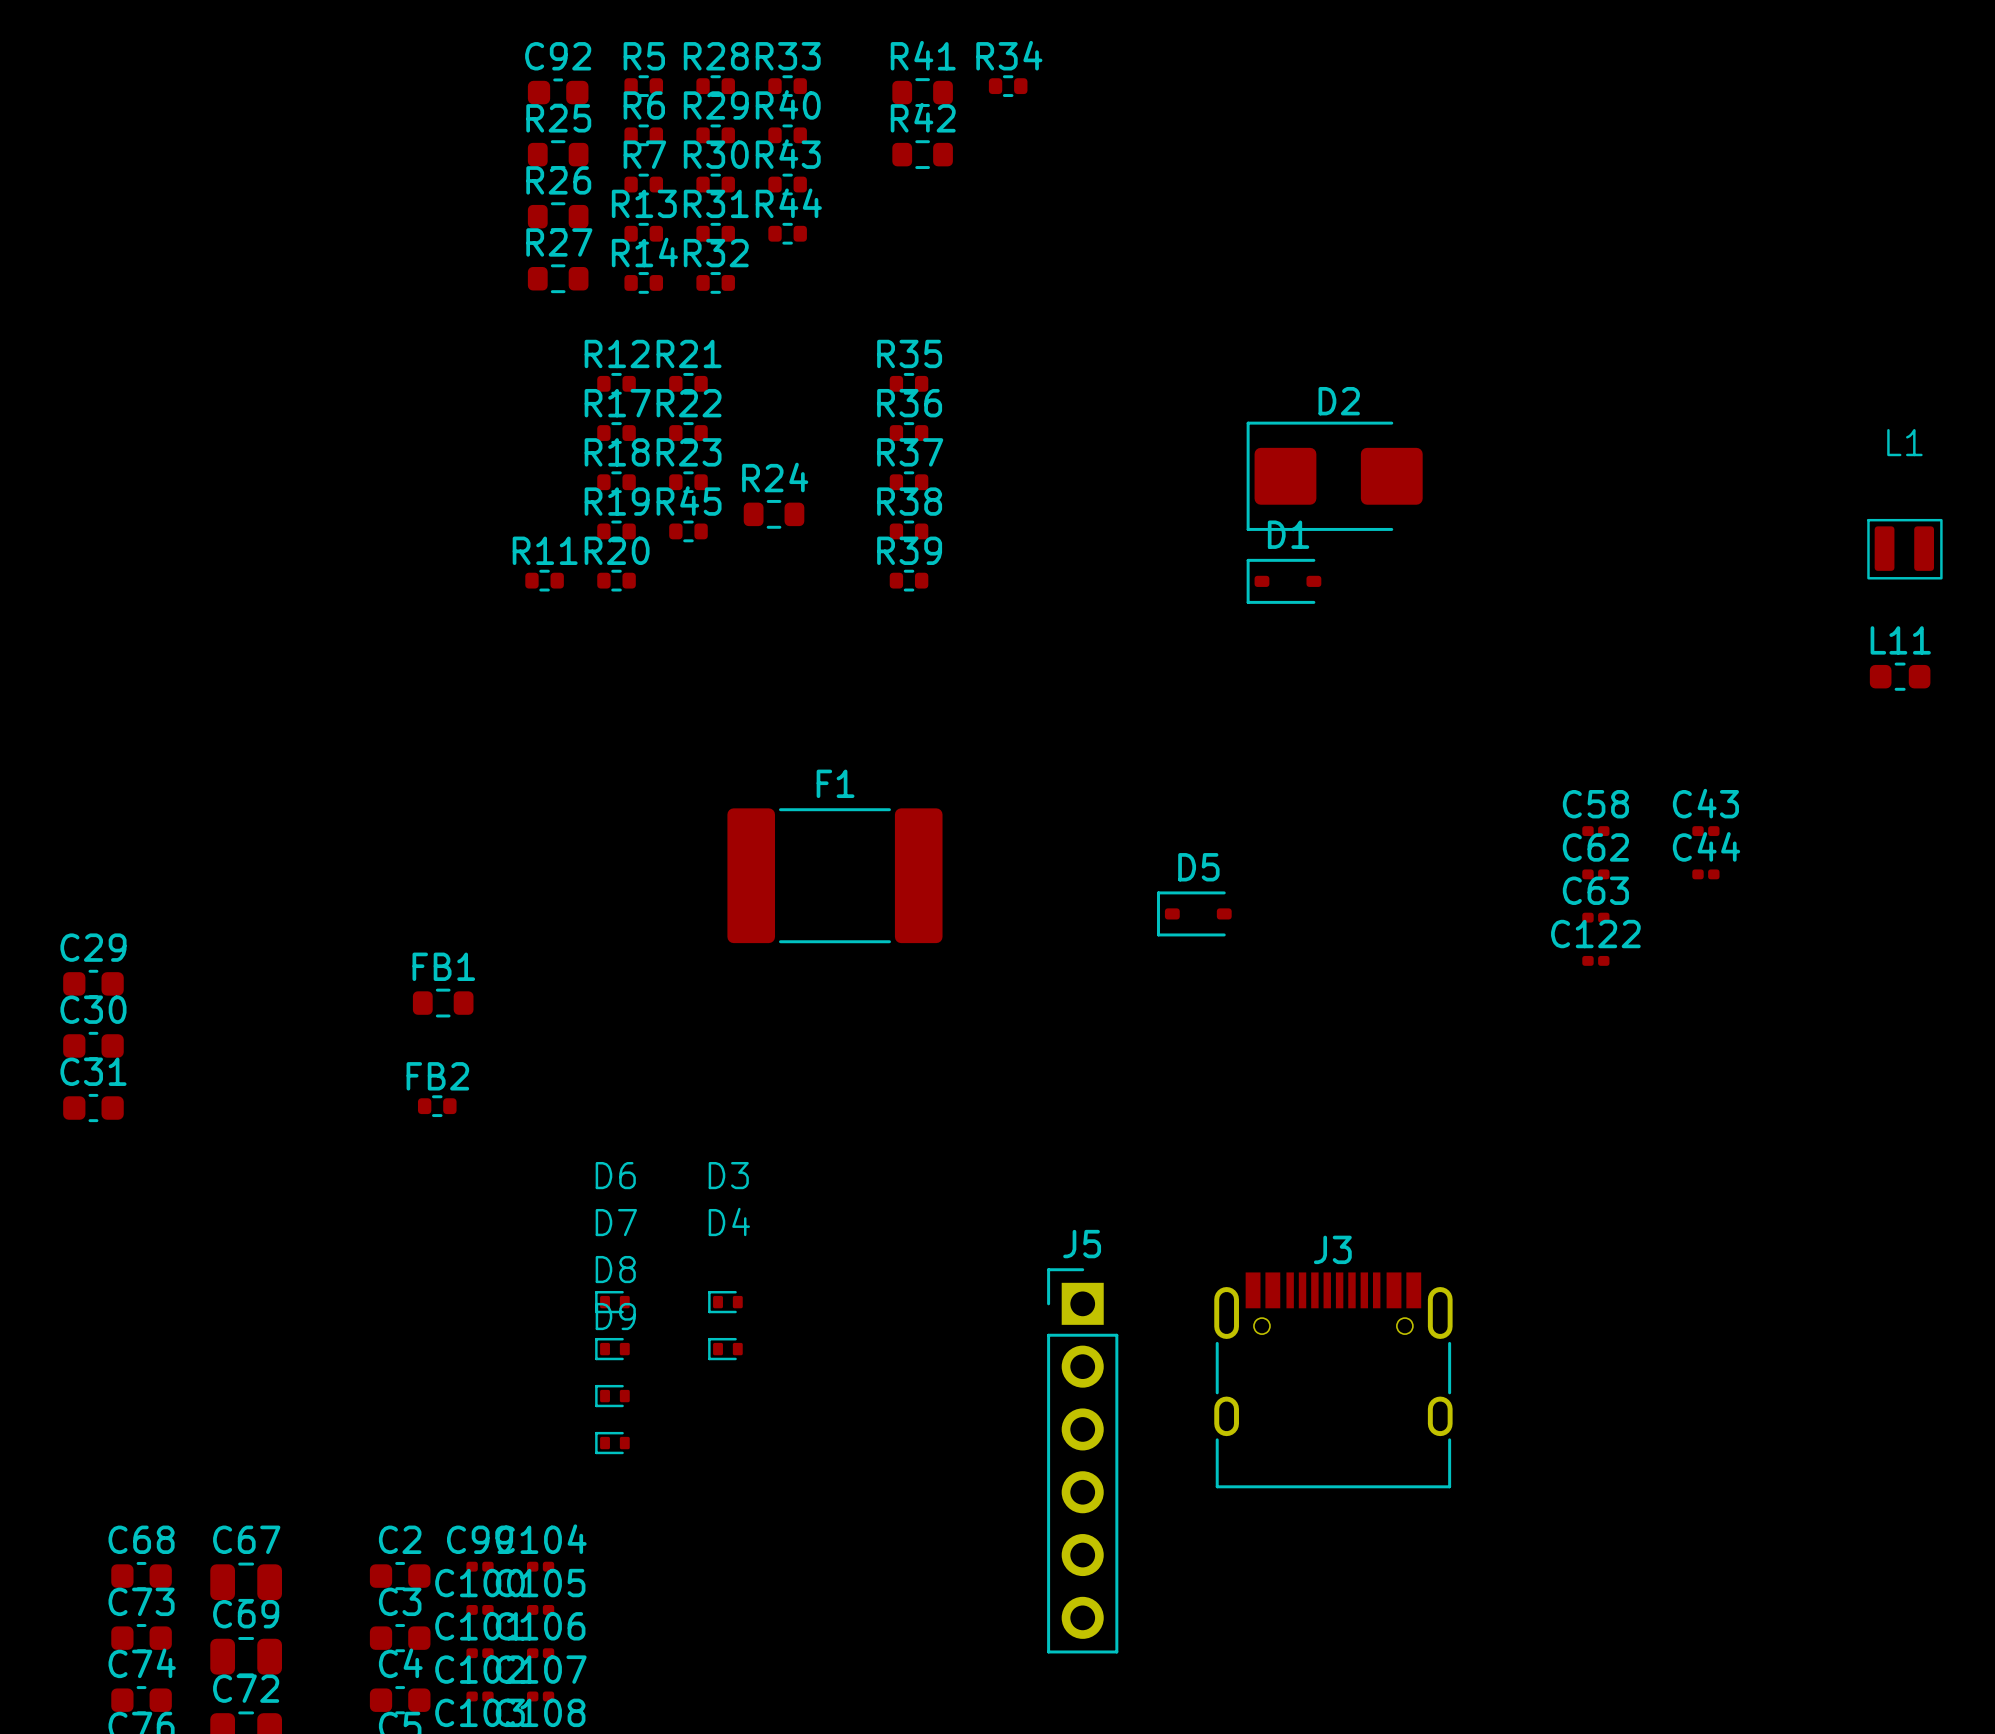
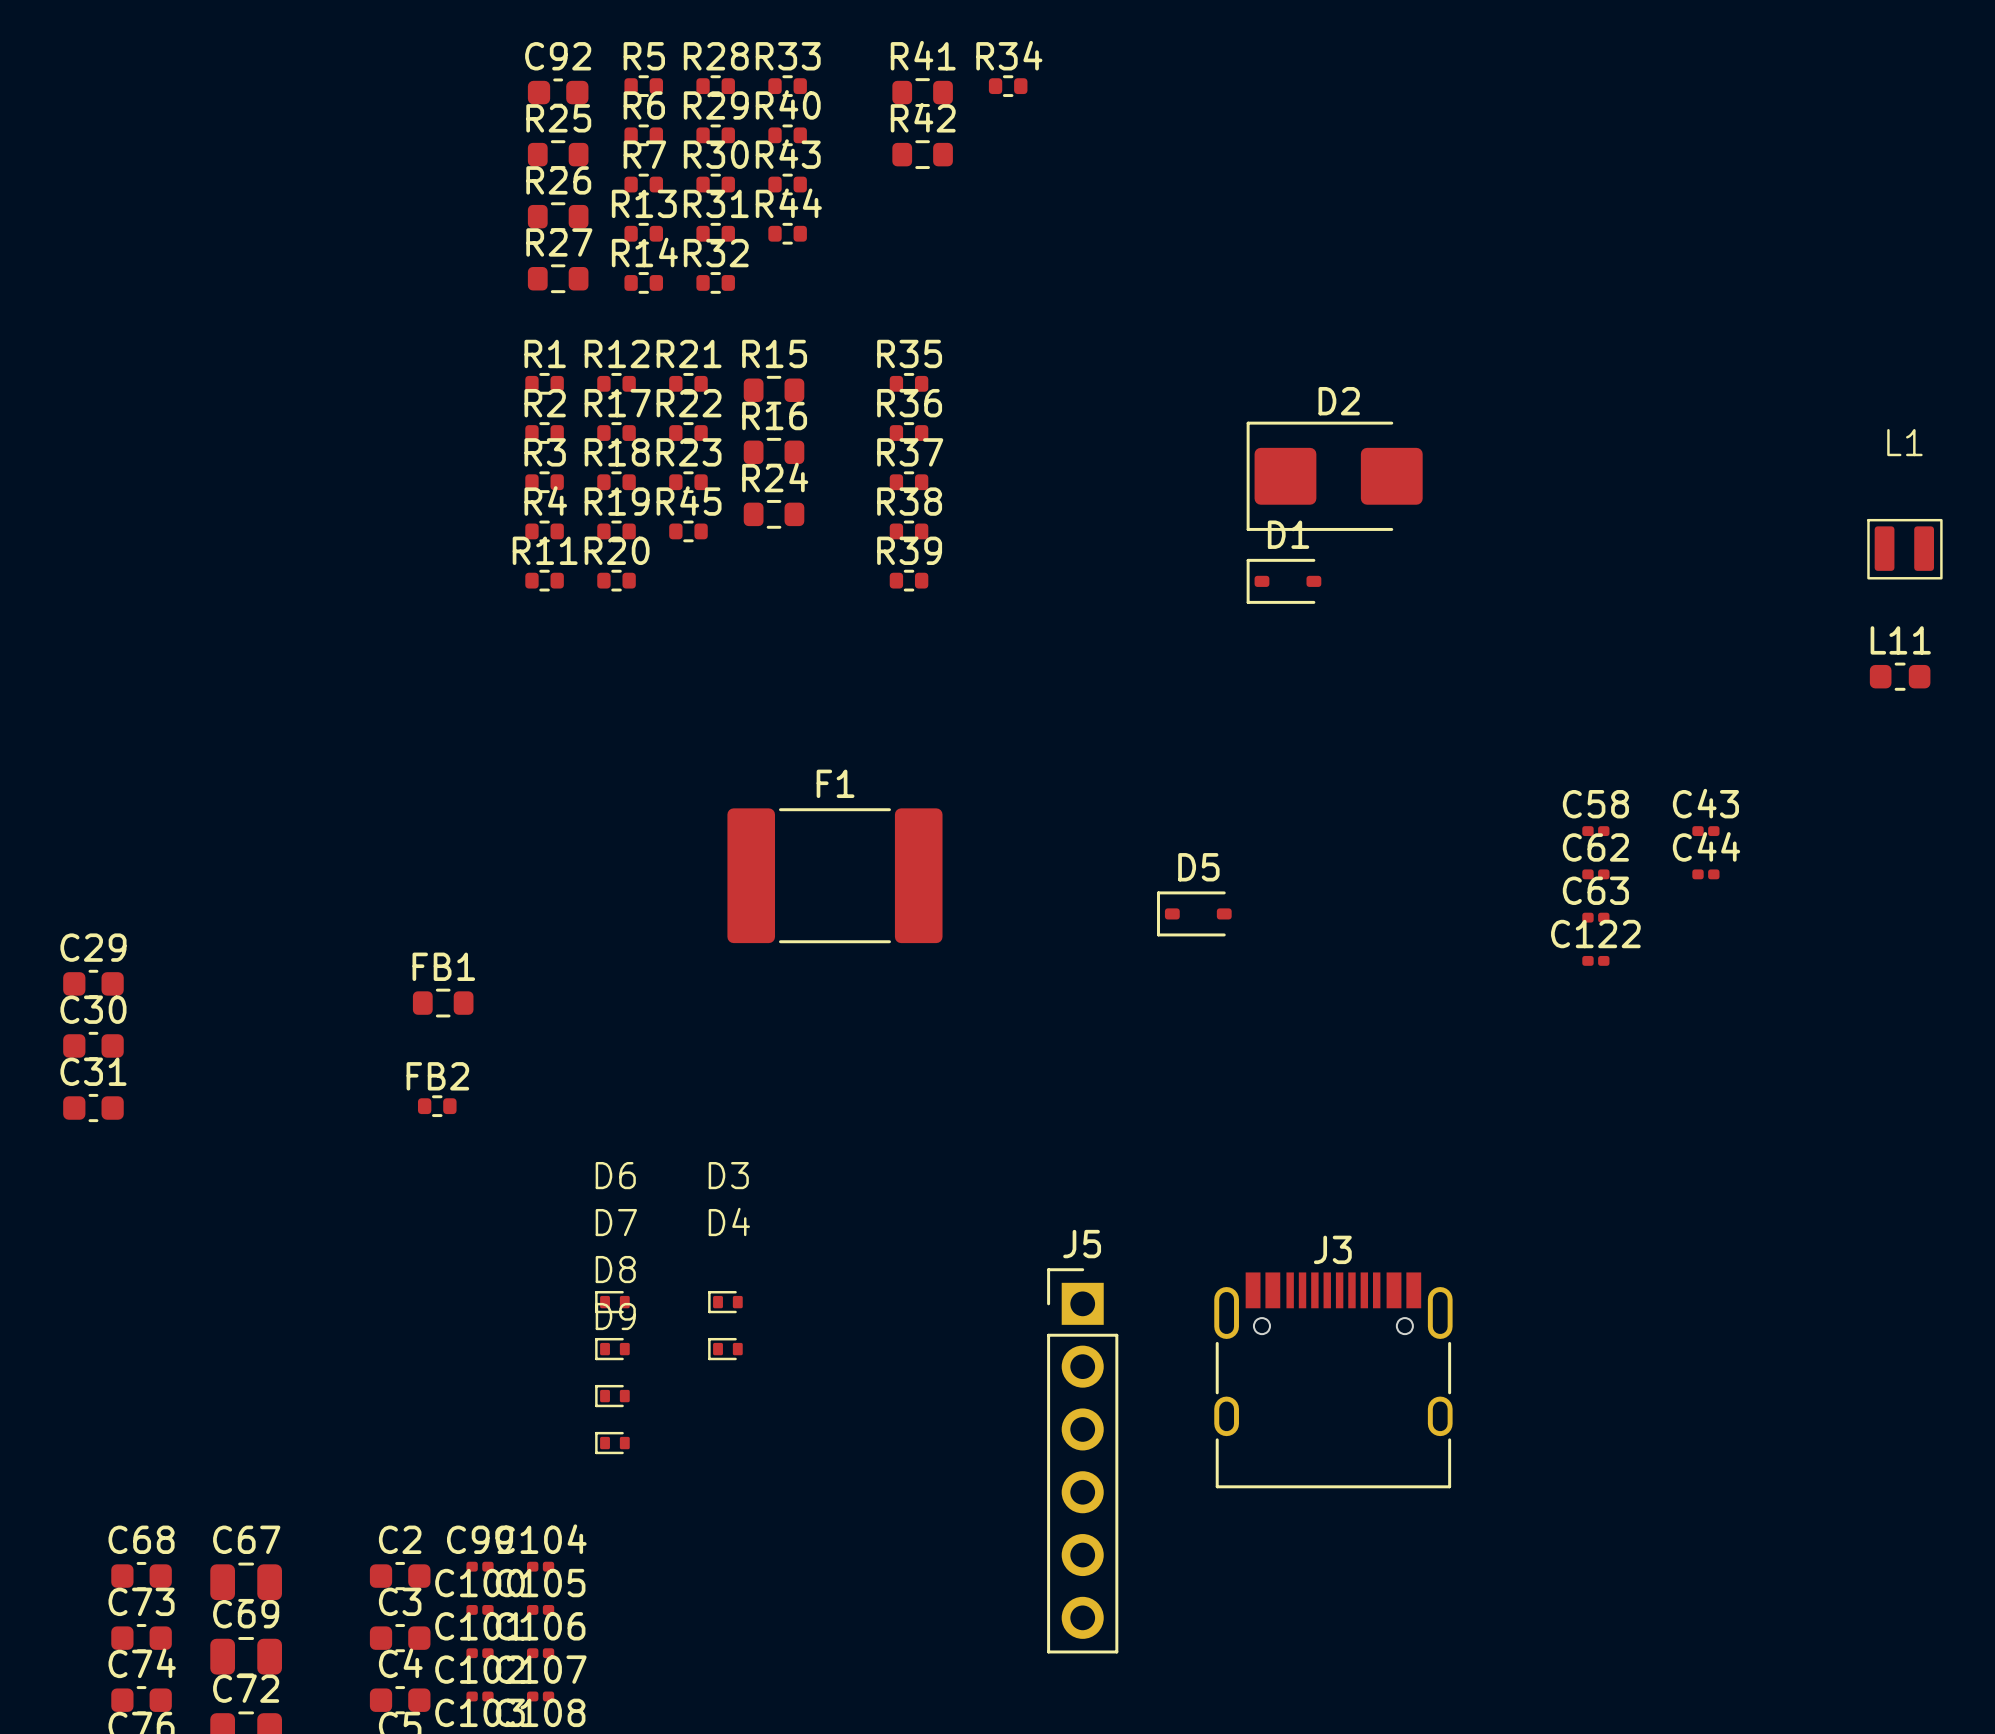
R1: none -> (544, 383)
R15: none -> (774, 390)
R2: none -> (544, 433)
R16: none -> (774, 452)
R3: none -> (544, 482)
R4: none -> (544, 531)

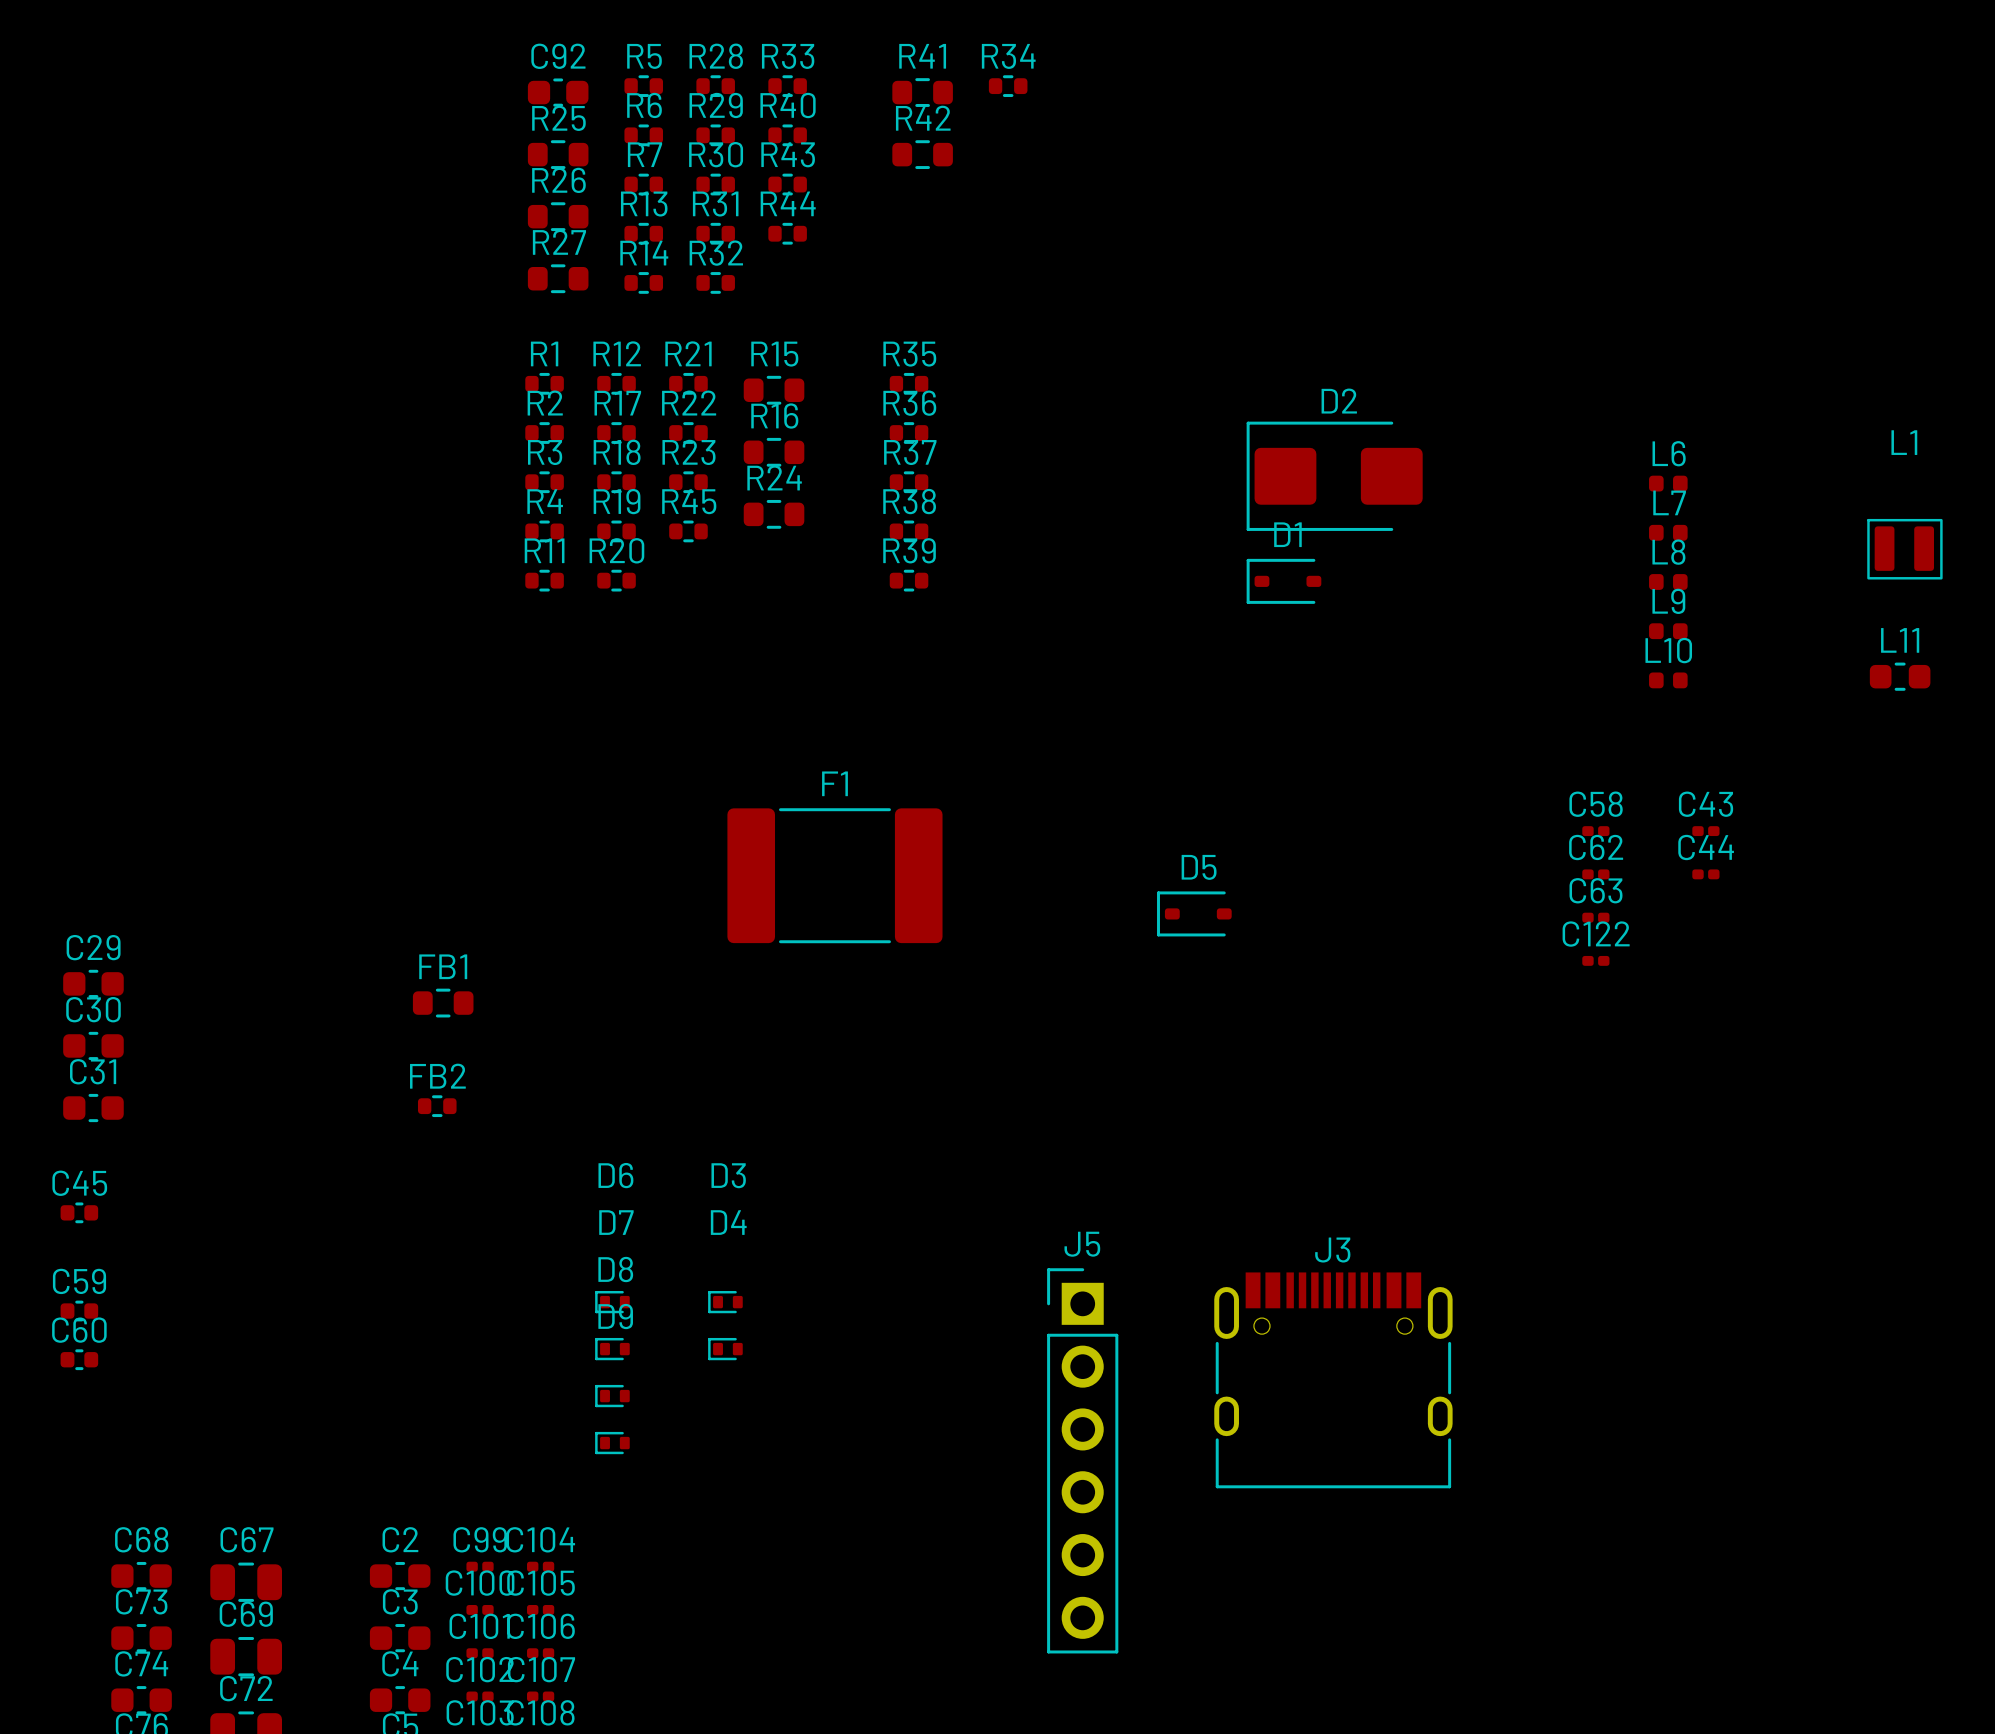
L6: none -> (1668, 483)
L7: none -> (1668, 532)
L8: none -> (1668, 581)
L9: none -> (1668, 631)
L10: none -> (1668, 680)
C45: none -> (79, 1212)
C59: none -> (79, 1311)
C60: none -> (79, 1359)

